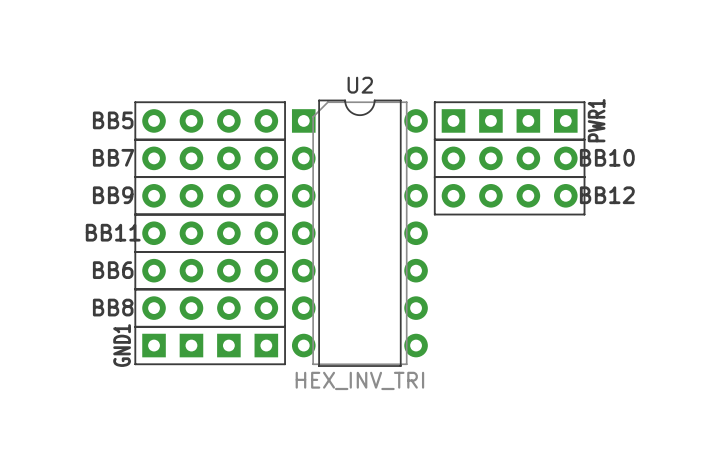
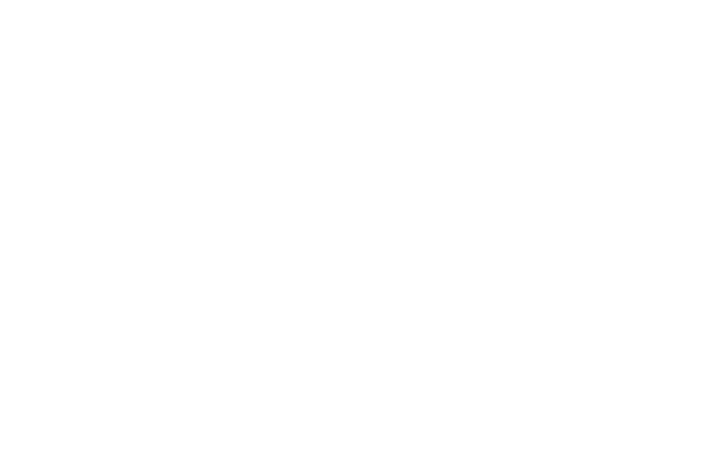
BB5: (210, 120) -> none
PWR1: (509, 120) -> none
BB7: (210, 158) -> none
BB10: (509, 158) -> none
BB9: (210, 195) -> none
BB12: (509, 195) -> none
BB11: (210, 233) -> none
U2: HEX_INV_TRI (359, 233) -> none
BB6: (210, 270) -> none
BB8: (210, 308) -> none
GND1: (210, 345) -> none

